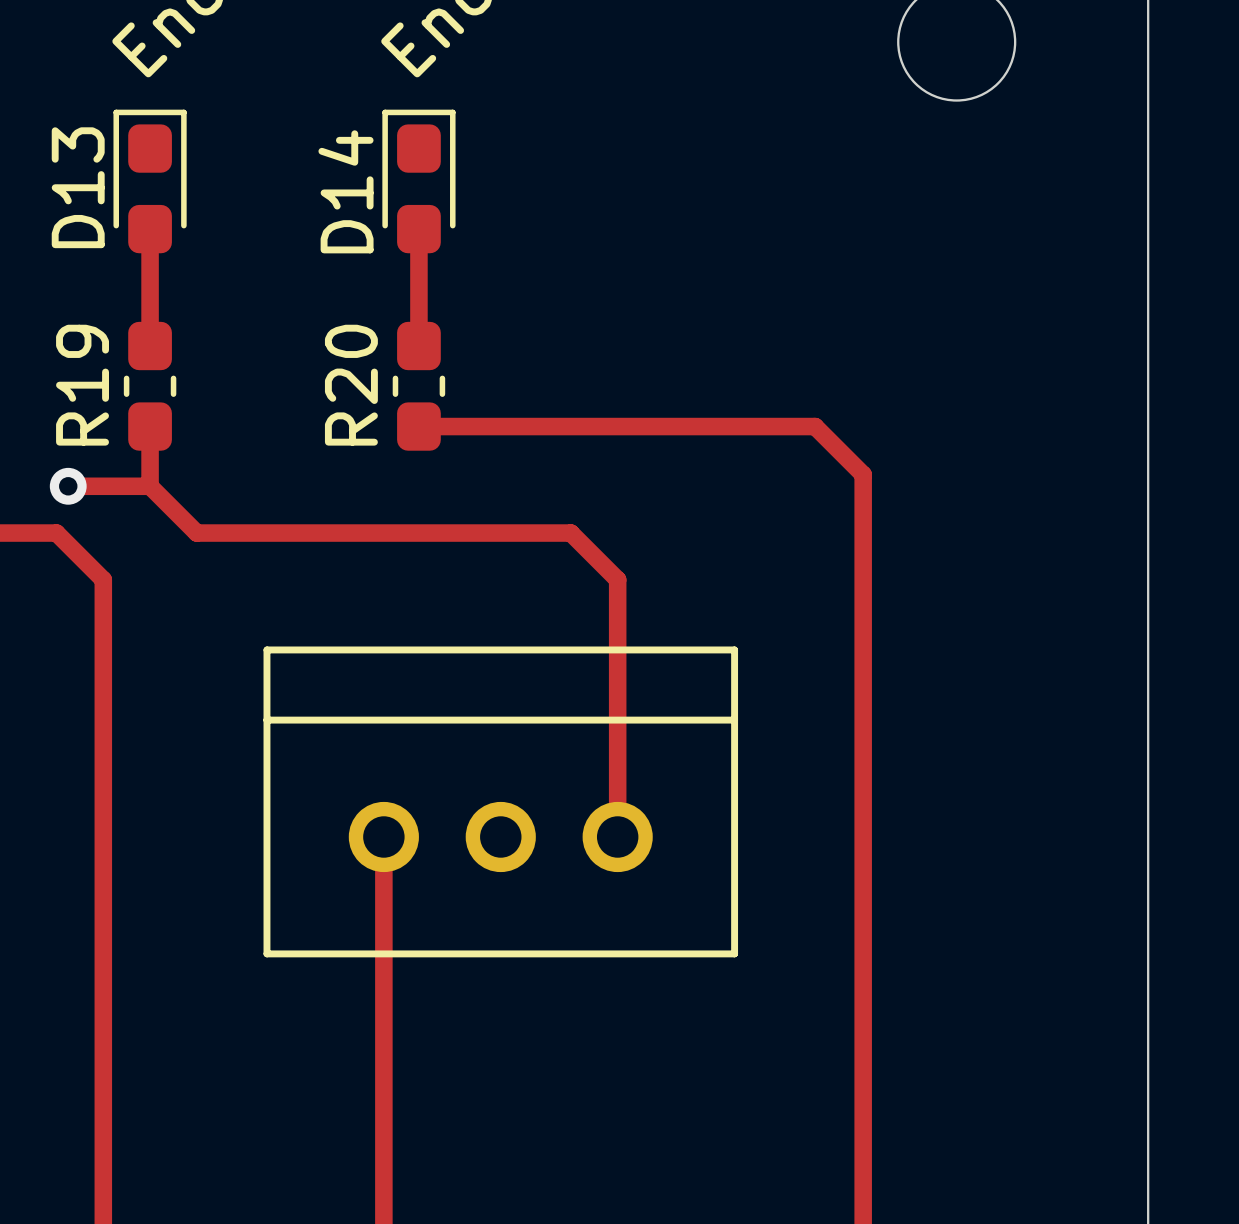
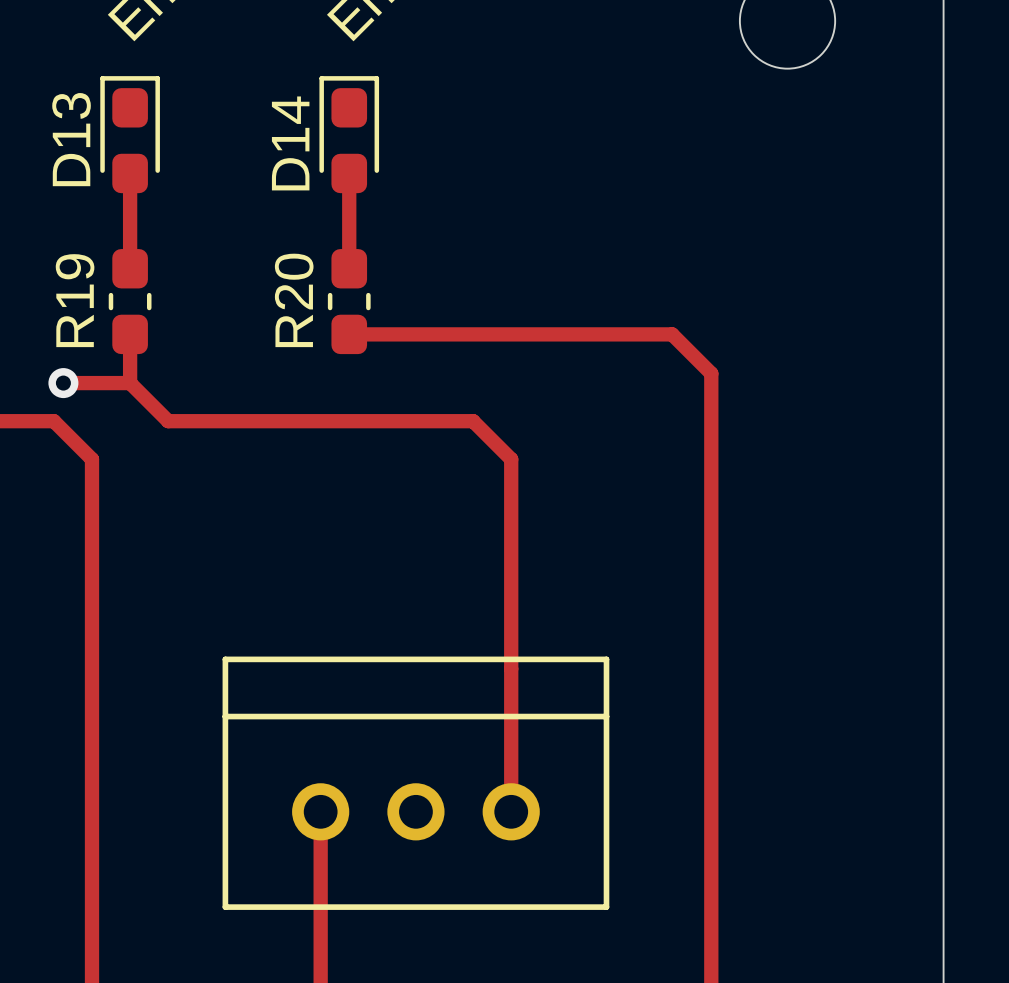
part position: (500, 801) -> (415, 783)
track: none -> (511, 668) (511, 811)
track: (383, 843) (383, 1012) -> none

